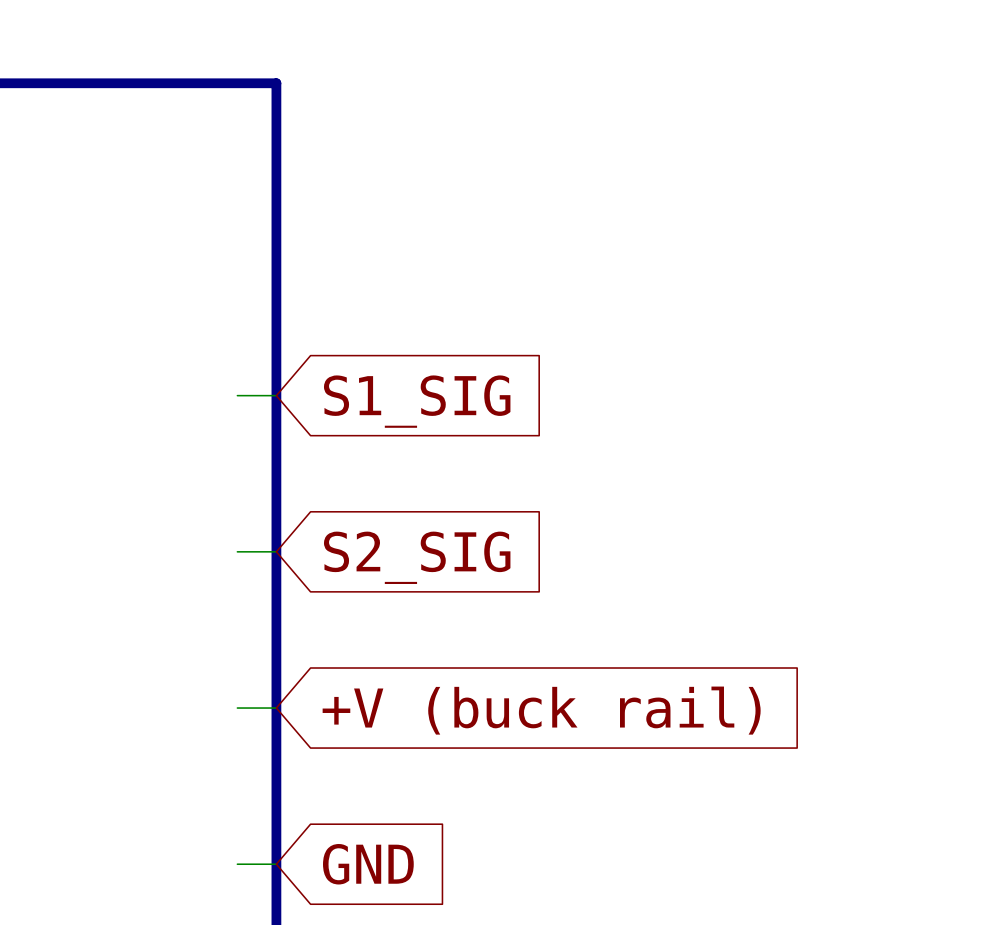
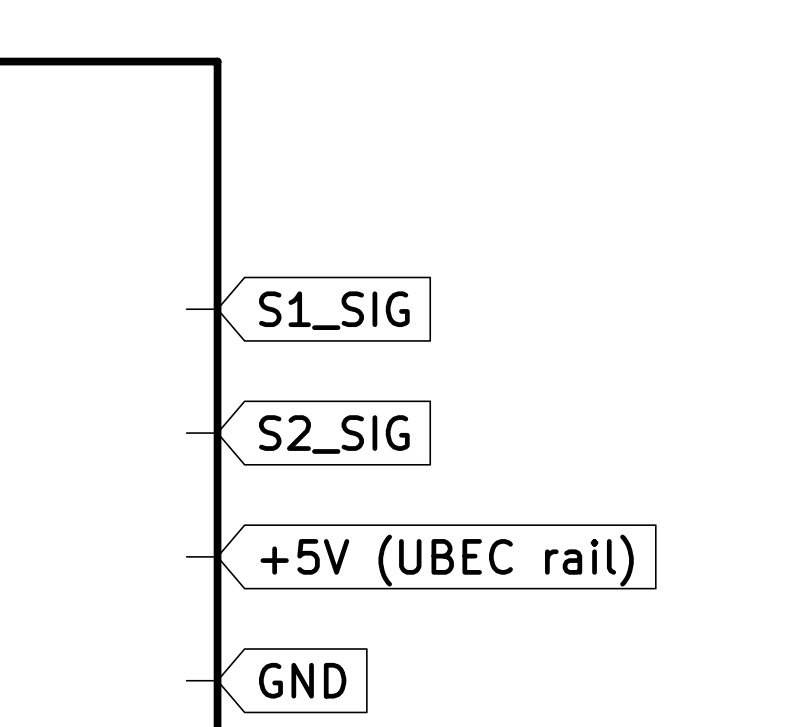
global label: +V (buck rail) (541, 710) -> +5V (UBEC rail) (447, 560)

